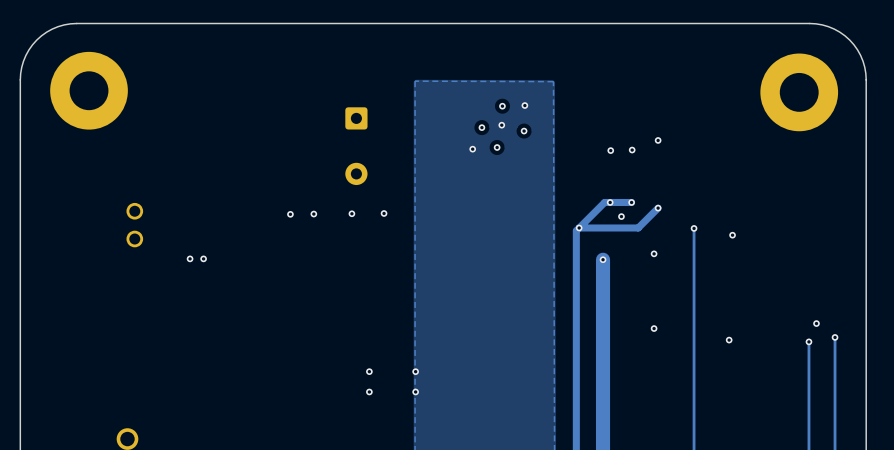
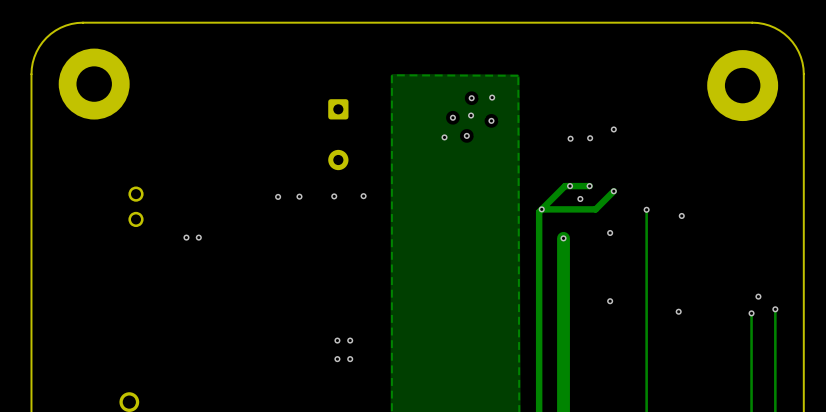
via: none -> (337, 340)
via: (415, 371) -> none
via: none -> (337, 359)
via: (415, 391) -> none

